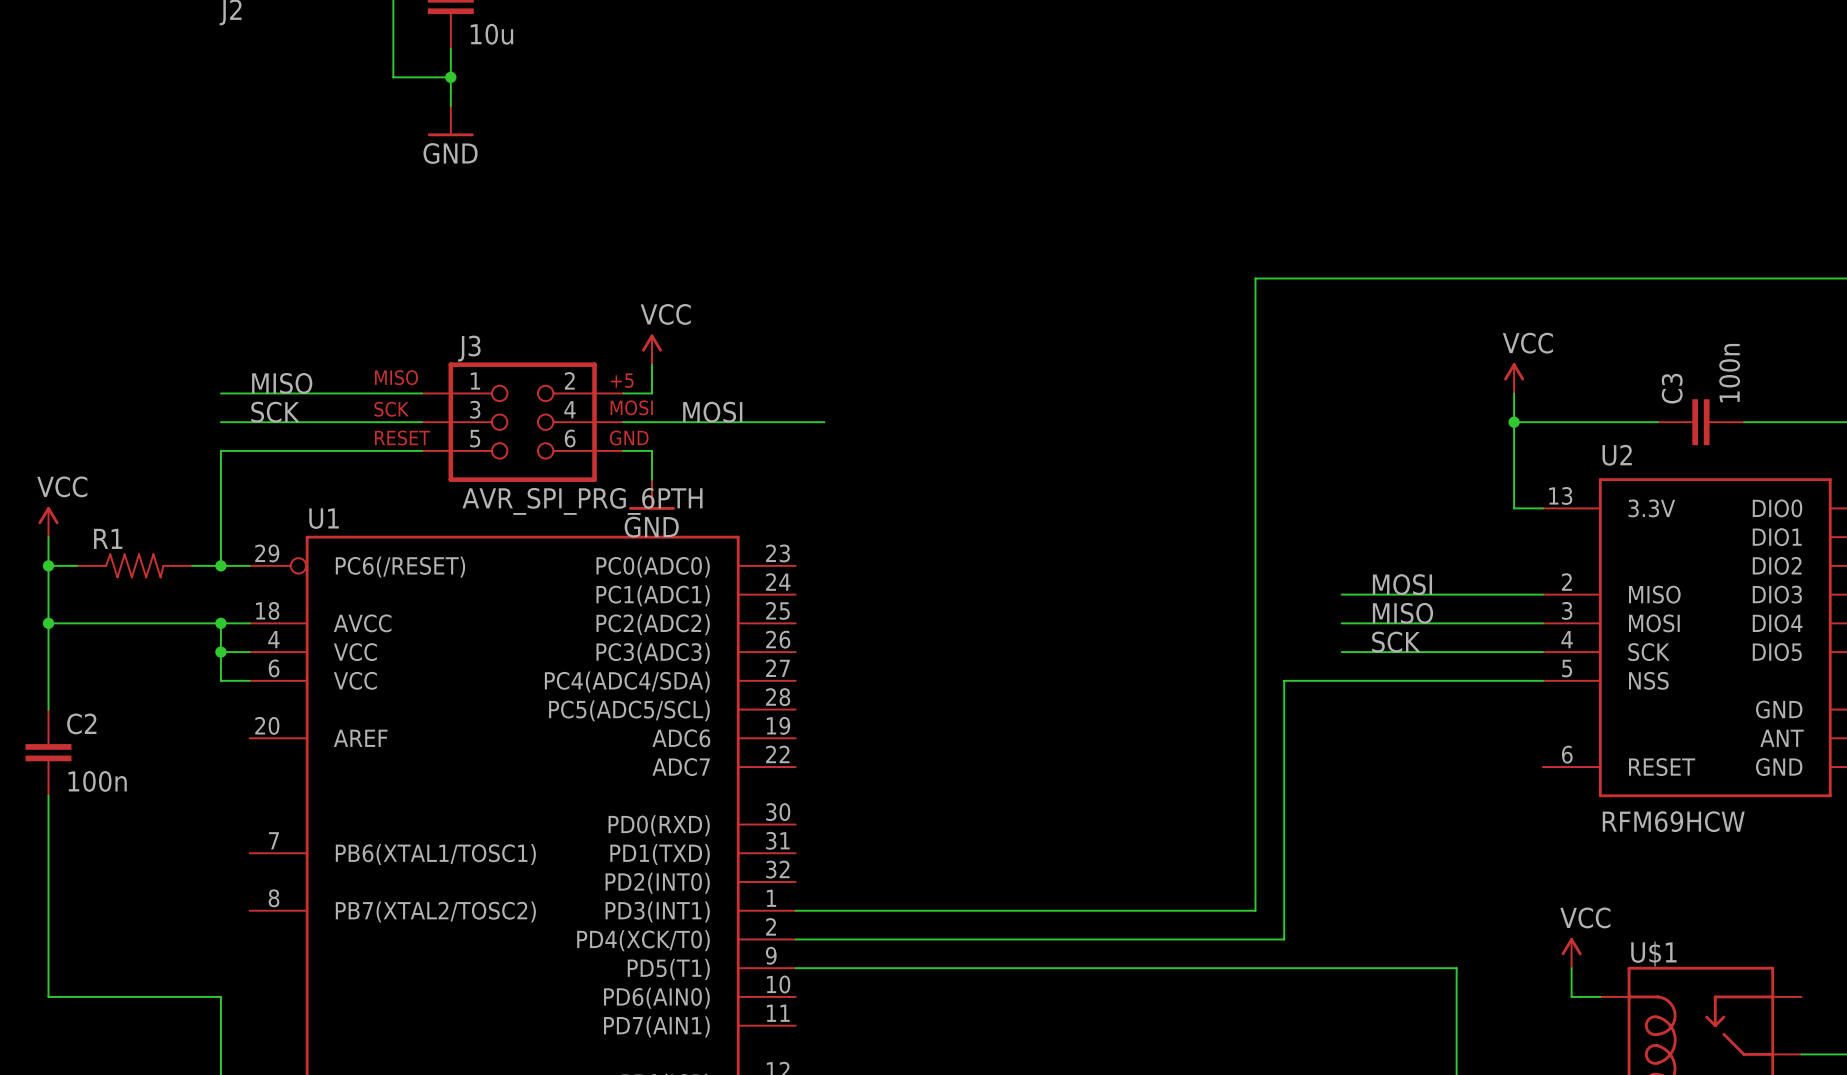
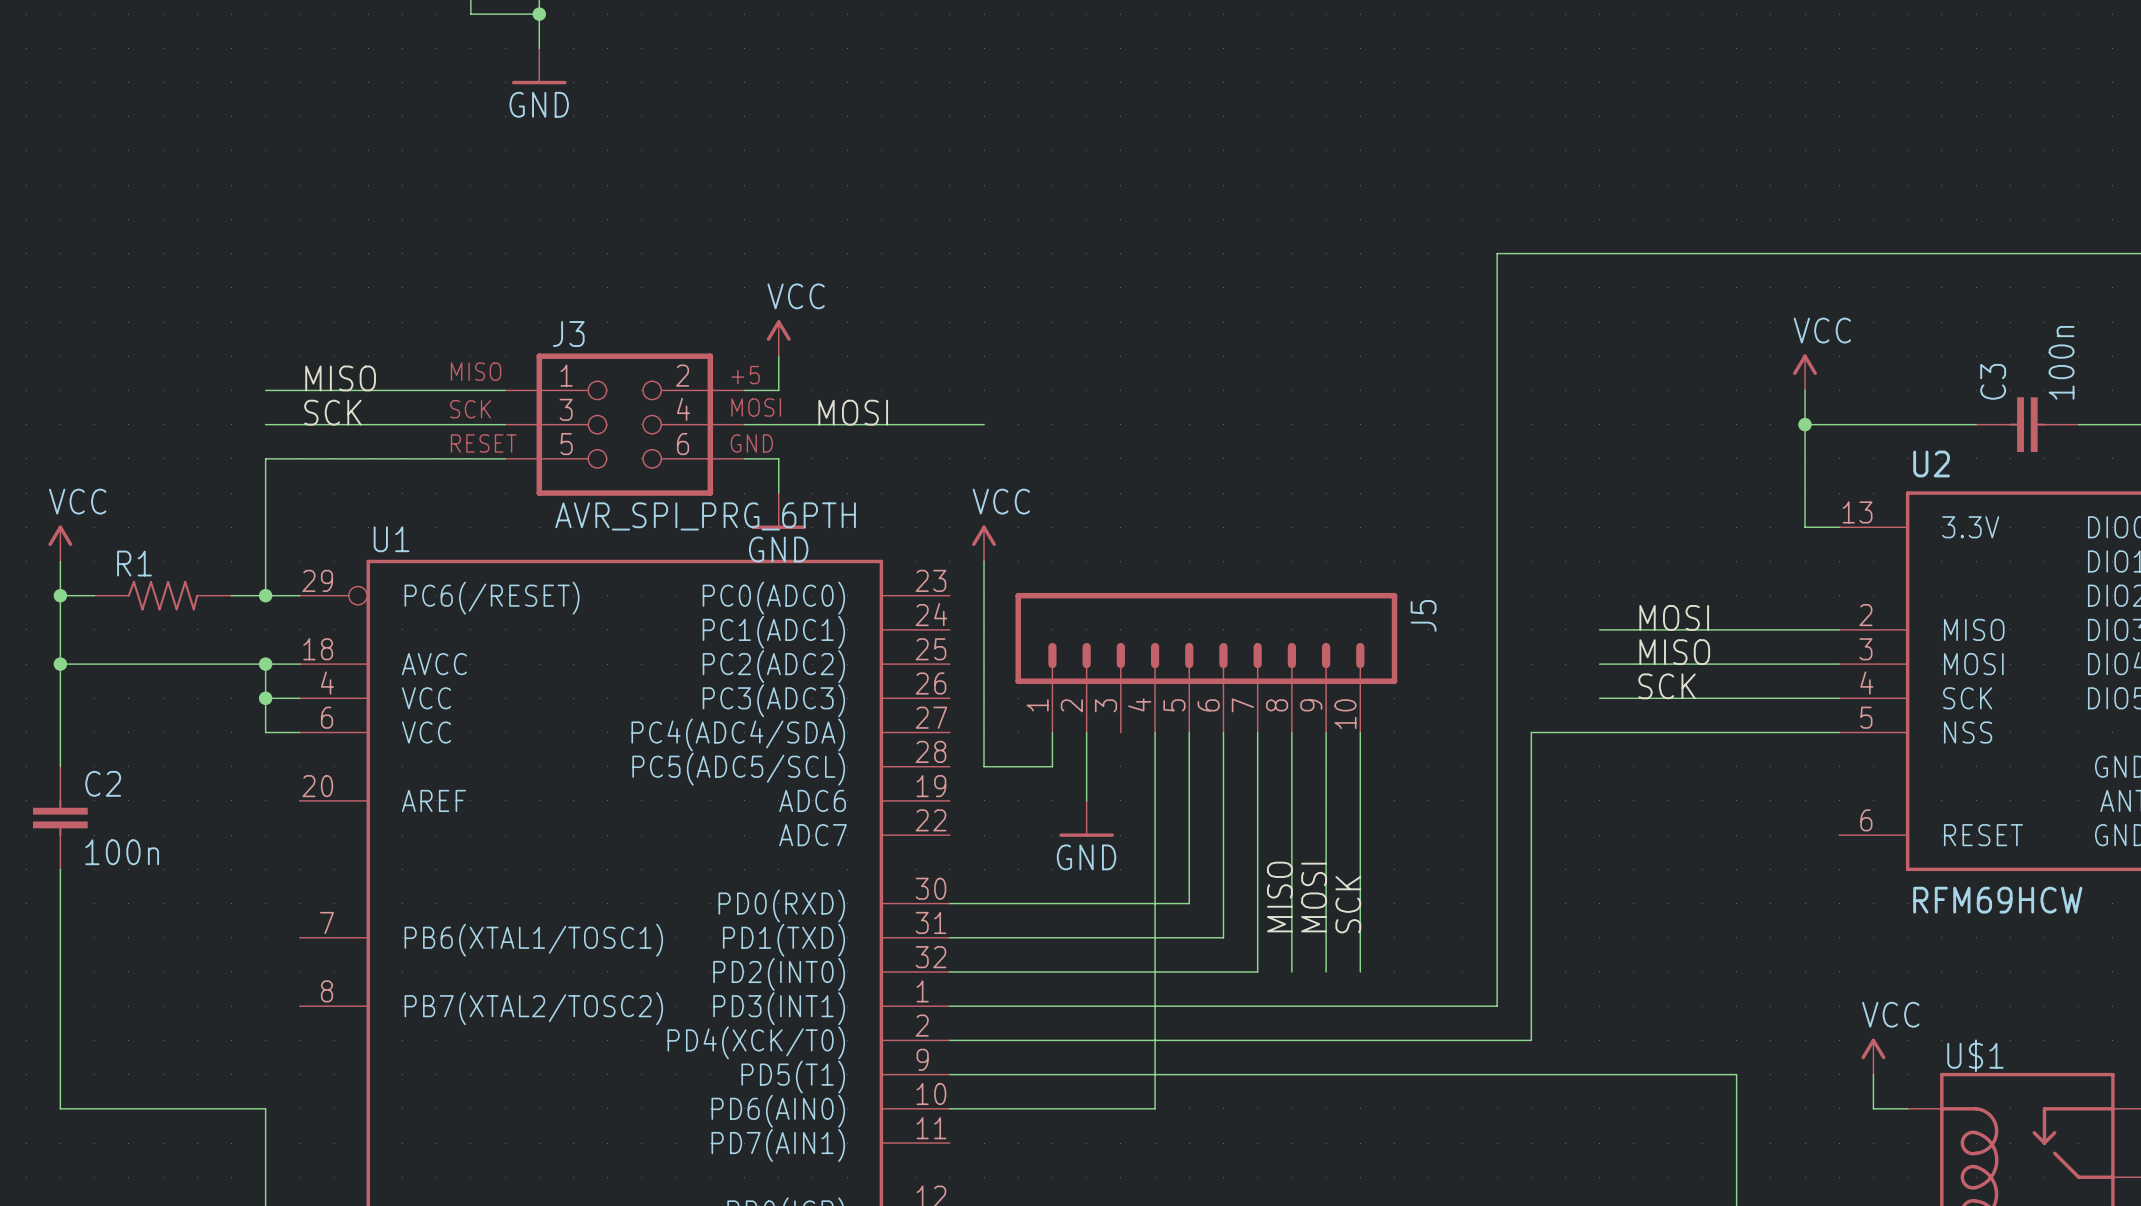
power symbol: none -> VCC (984, 543)
wire: none -> (984, 561) (984, 766) (1052, 766) (1052, 732)
J5: none -> (1206, 662)
wire: none -> (1086, 732) (1086, 800)
wire: none -> (1155, 732) (1155, 1108) (949, 1108)
wire: none -> (1189, 732) (1189, 903) (949, 903)
wire: none -> (1223, 732) (1223, 937) (949, 937)
wire: none -> (1257, 732) (1257, 971) (949, 971)
wire: none -> (1291, 732) (1291, 971)
wire: none -> (1326, 732) (1326, 971)
wire: none -> (1360, 732) (1360, 971)
power symbol: none -> GND (1086, 818)
label: none -> MISO (1279, 897)
label: none -> MOSI (1314, 897)
label: none -> SCK (1348, 904)

